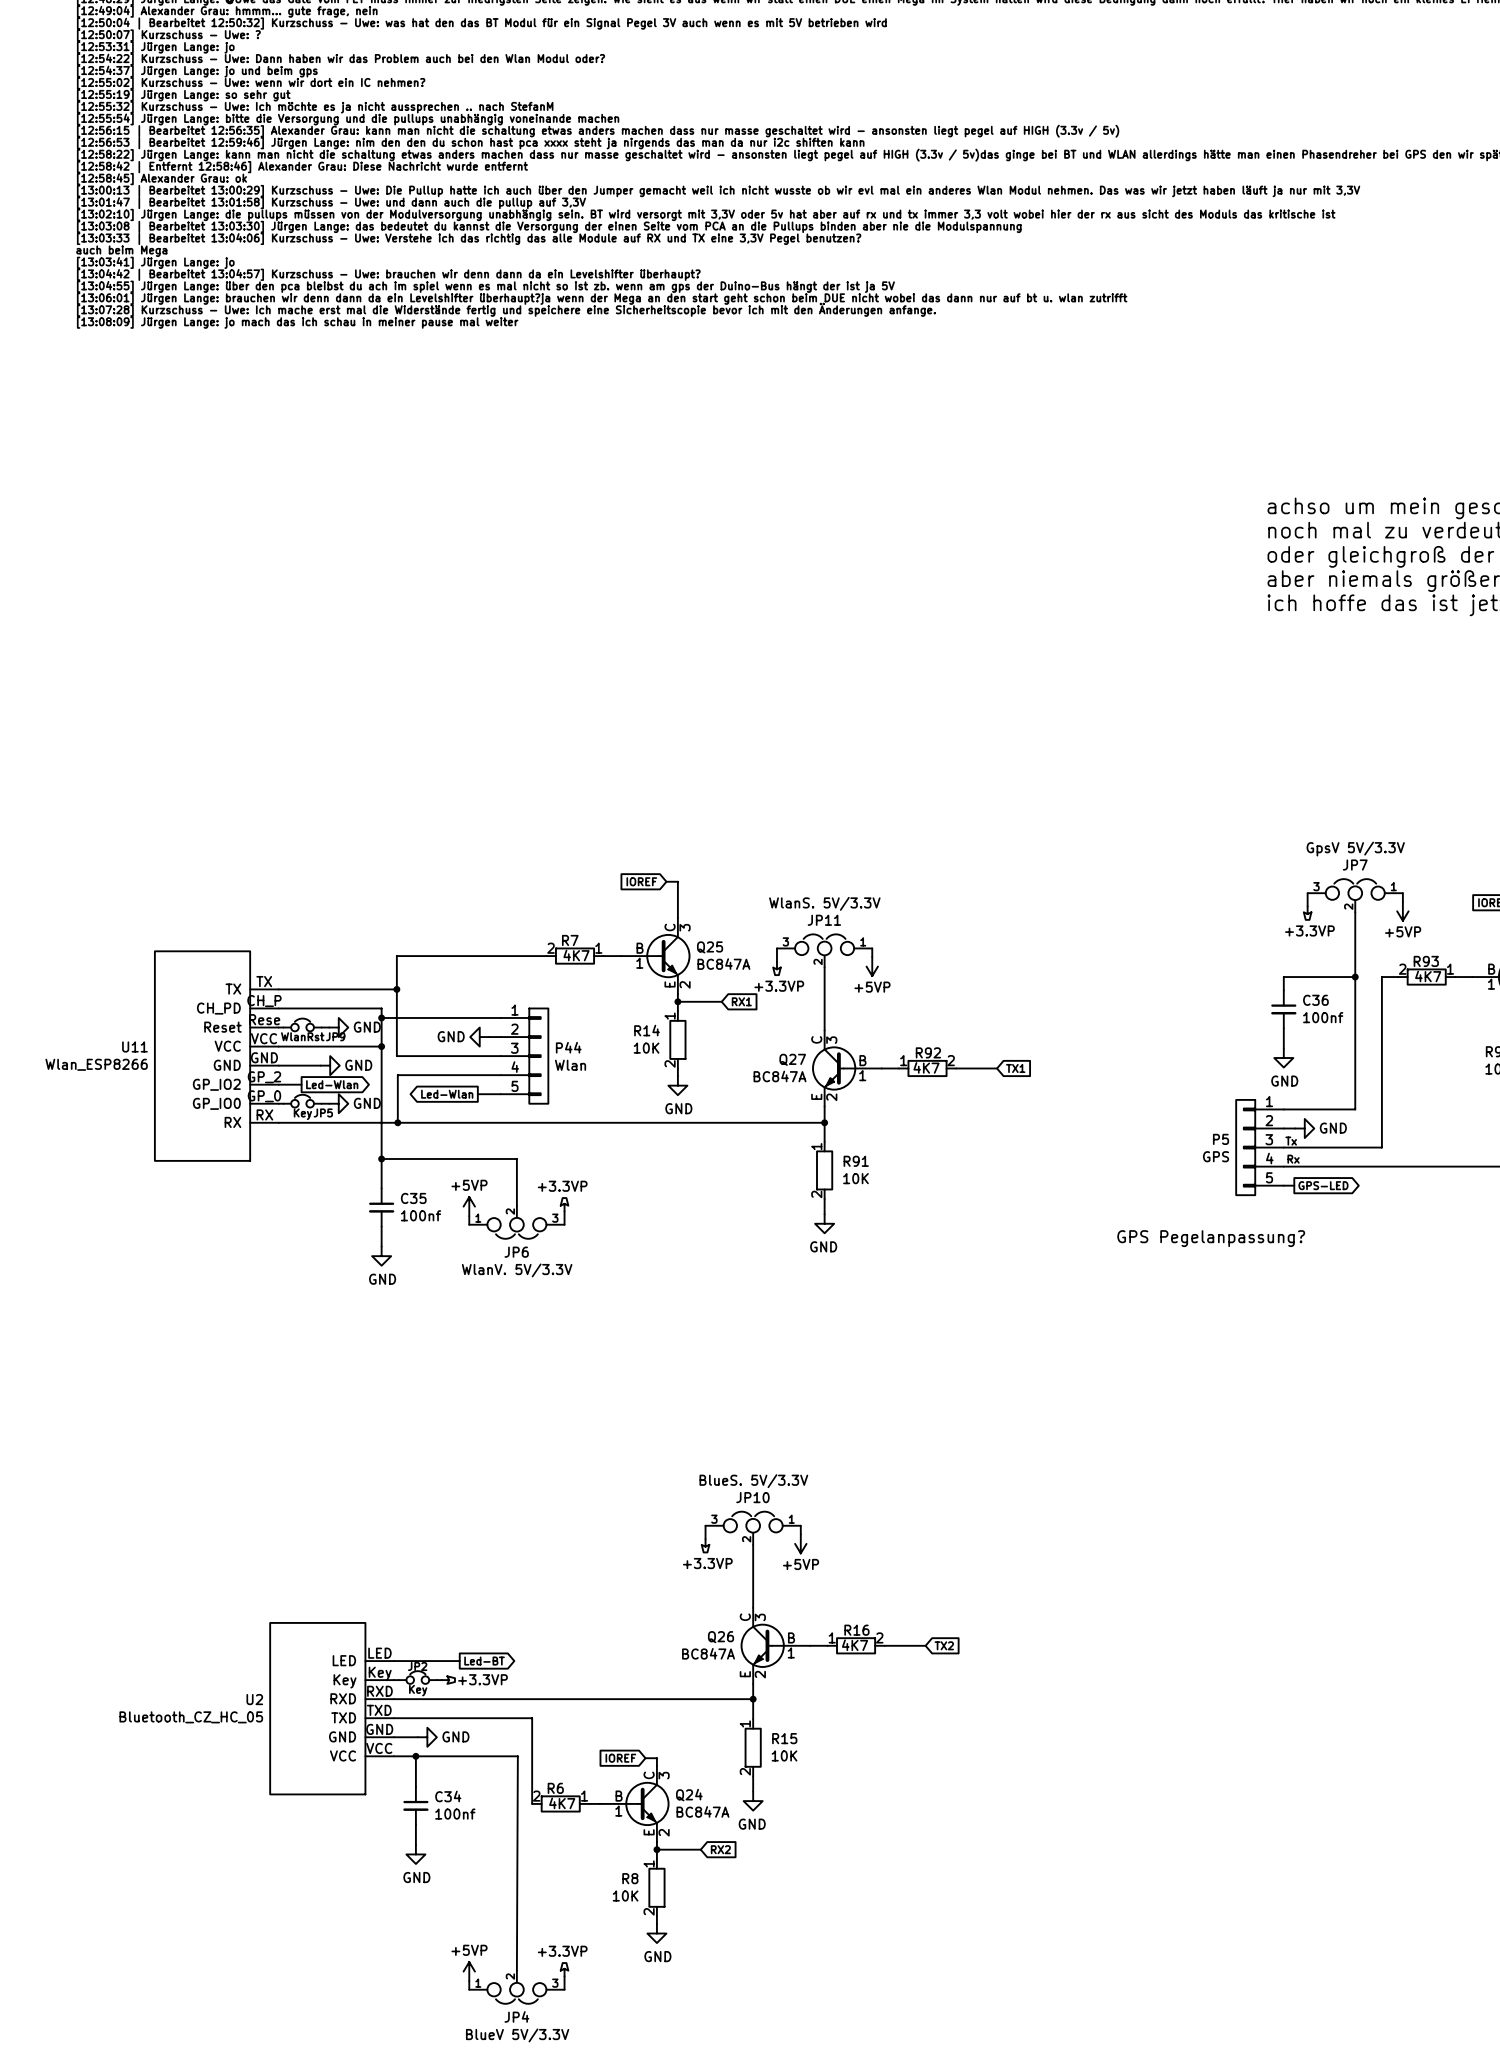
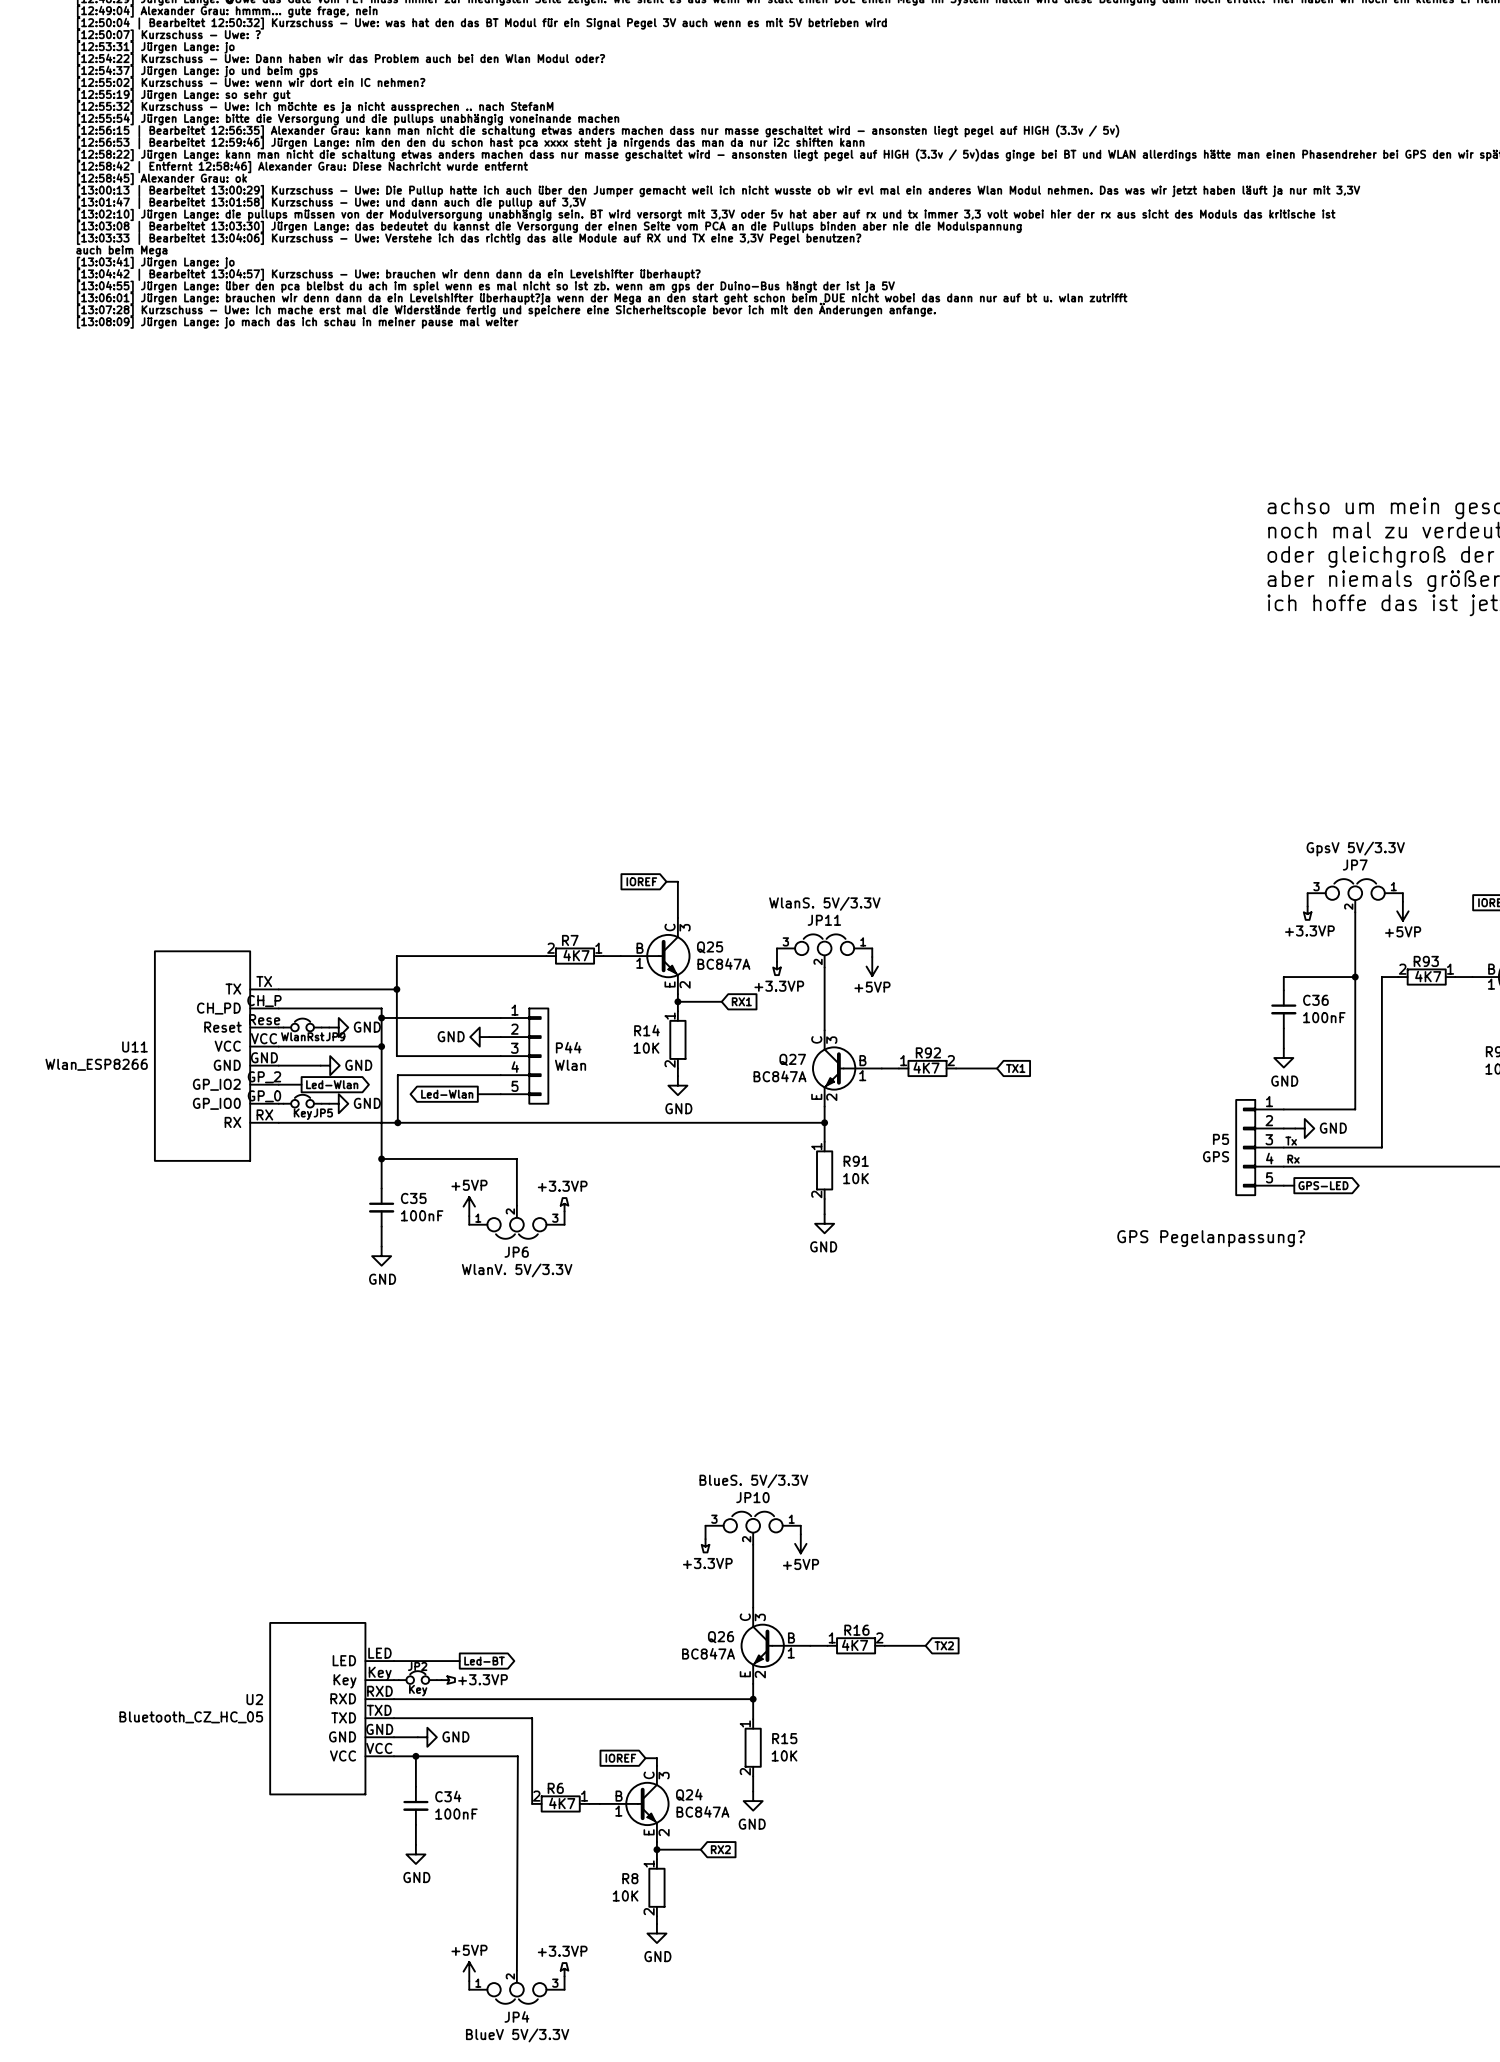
C36 value: 100nf (1323, 1017) -> 100nF (1324, 1017)
C35 value: 100nf (421, 1215) -> 100nF (422, 1215)
C34 value: 100nf (455, 1814) -> 100nF (456, 1814)

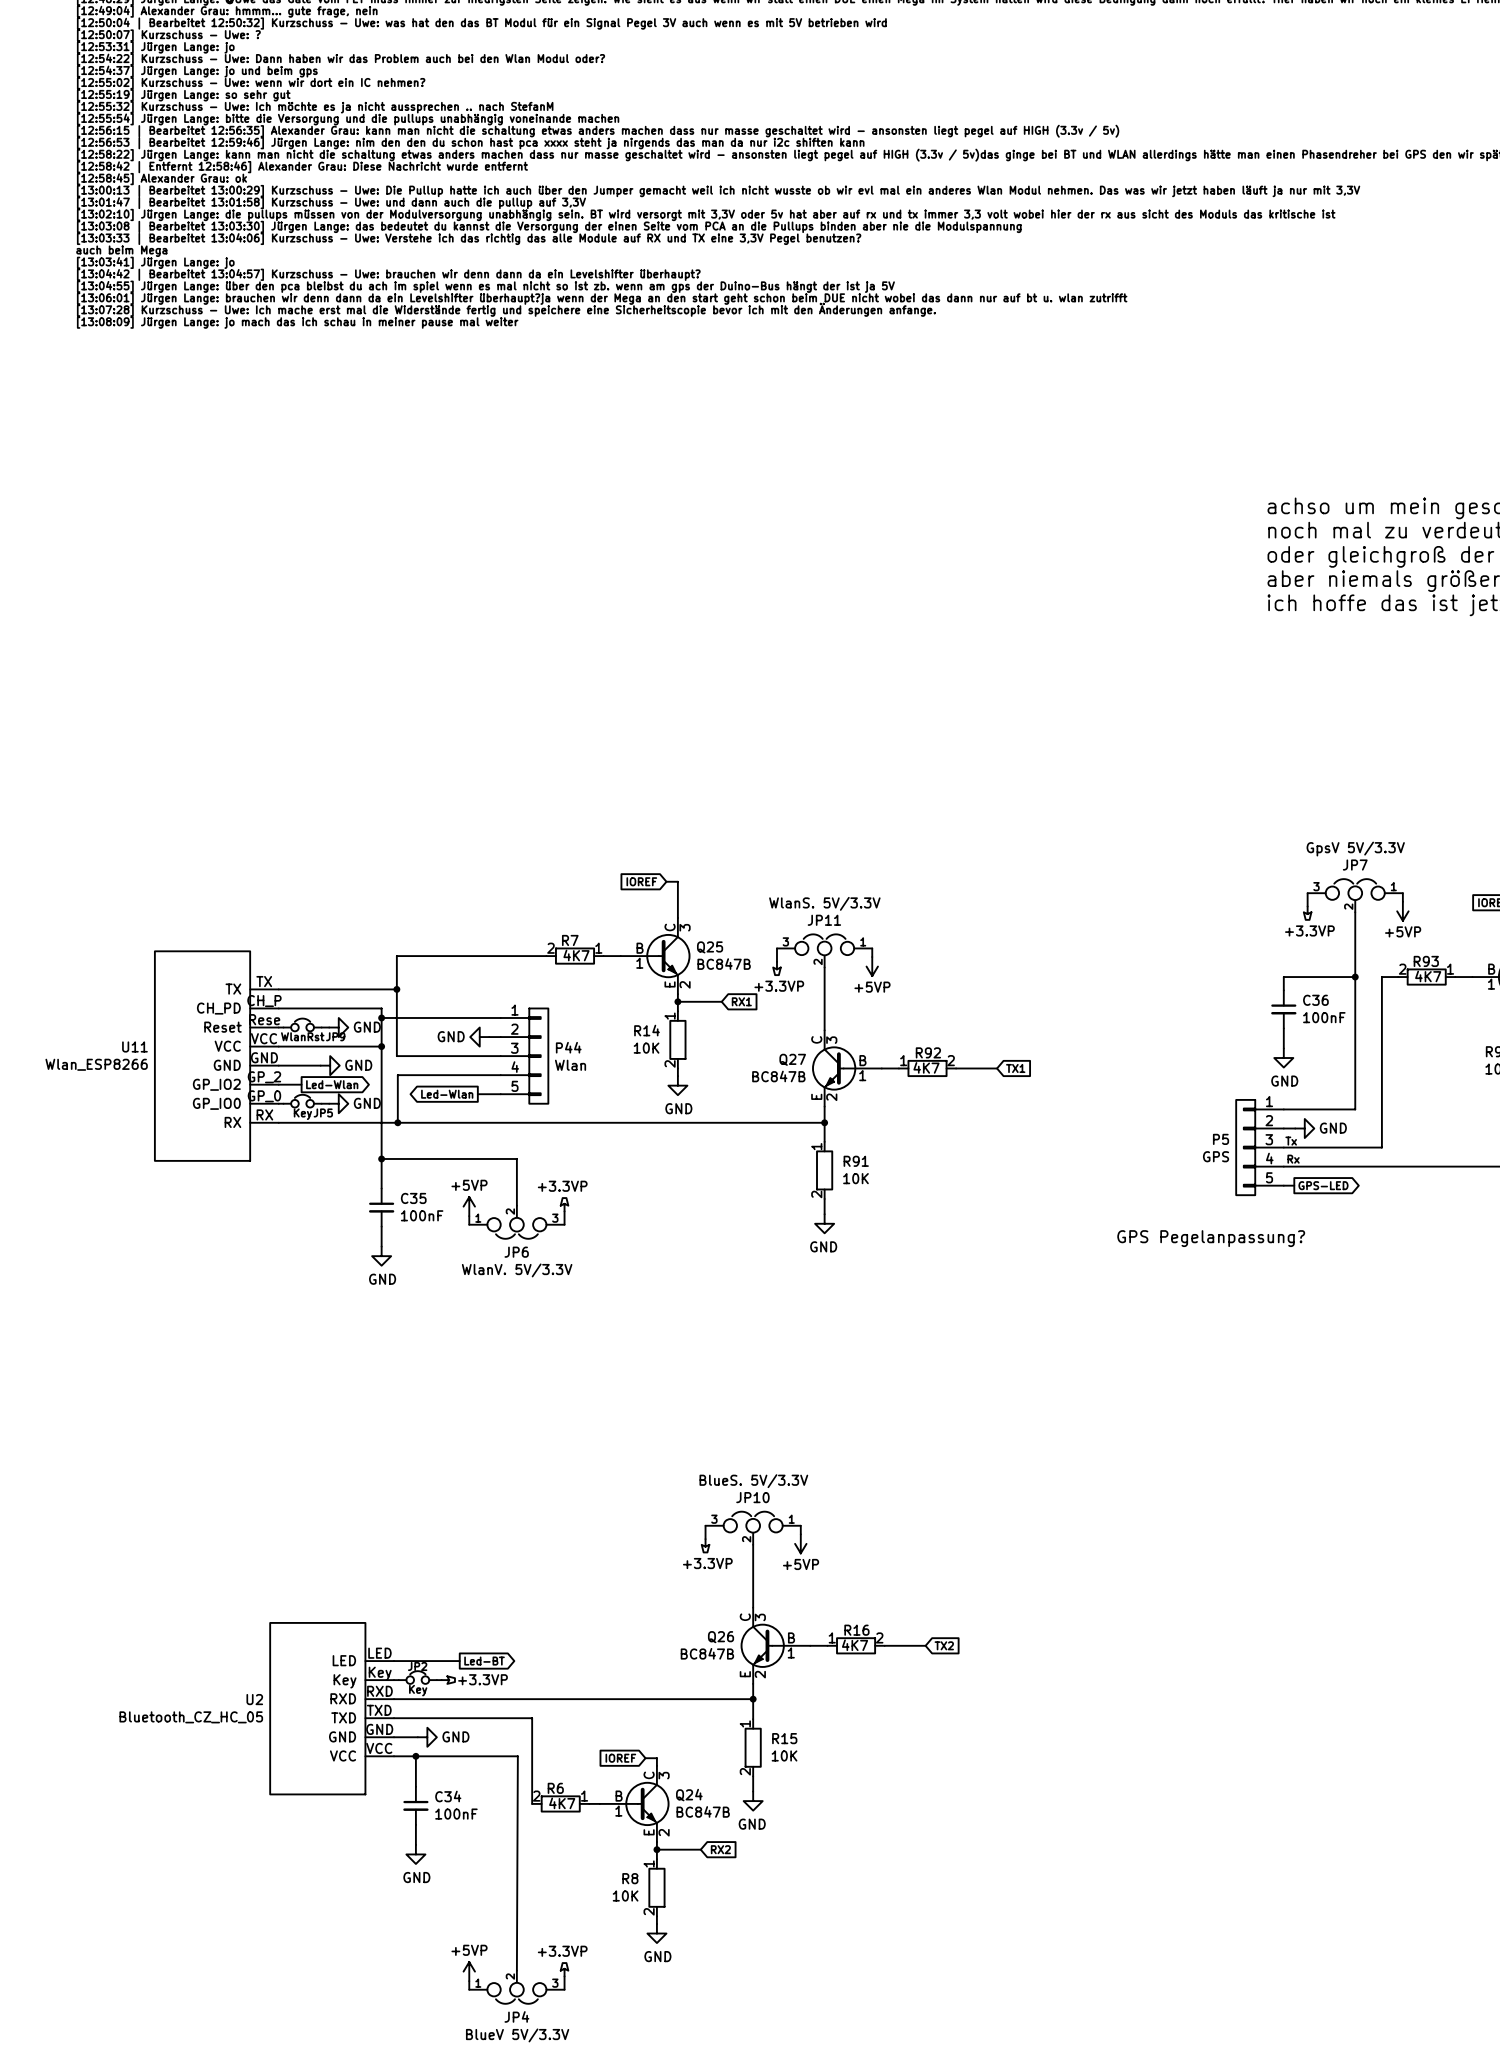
Q25 value: BC847A (723, 964) -> BC847B (724, 964)
Q27 value: BC847A (779, 1076) -> BC847B (778, 1076)
Q26 value: BC847A (708, 1653) -> BC847B (707, 1653)
Q24 value: BC847A (702, 1811) -> BC847B (703, 1811)

